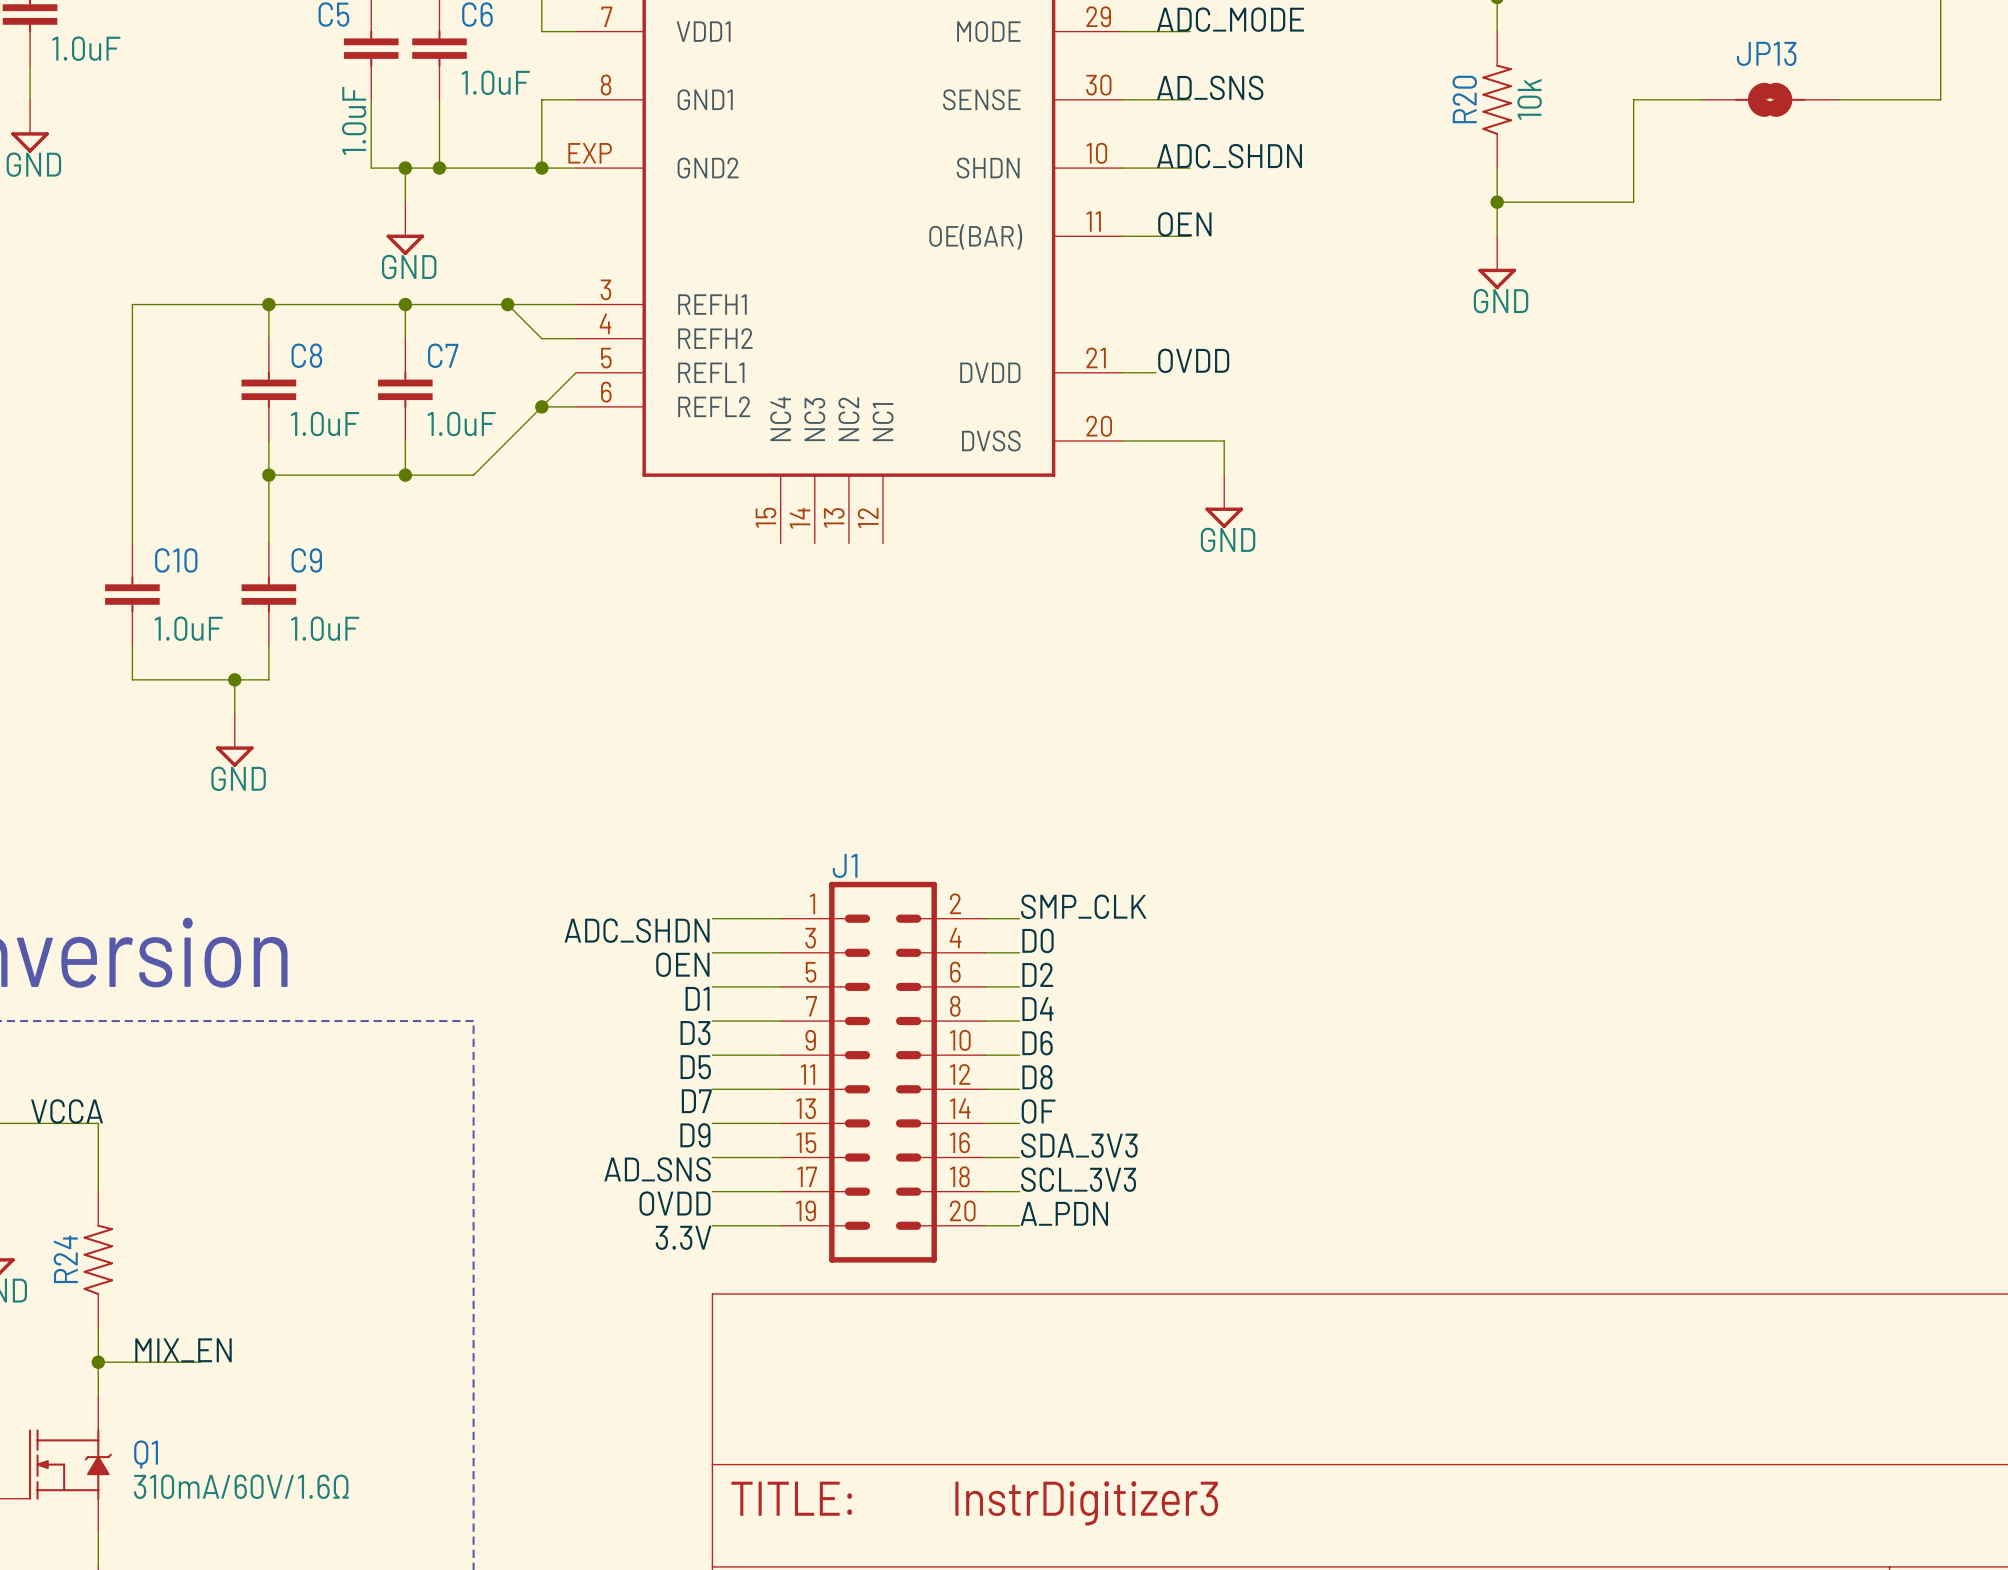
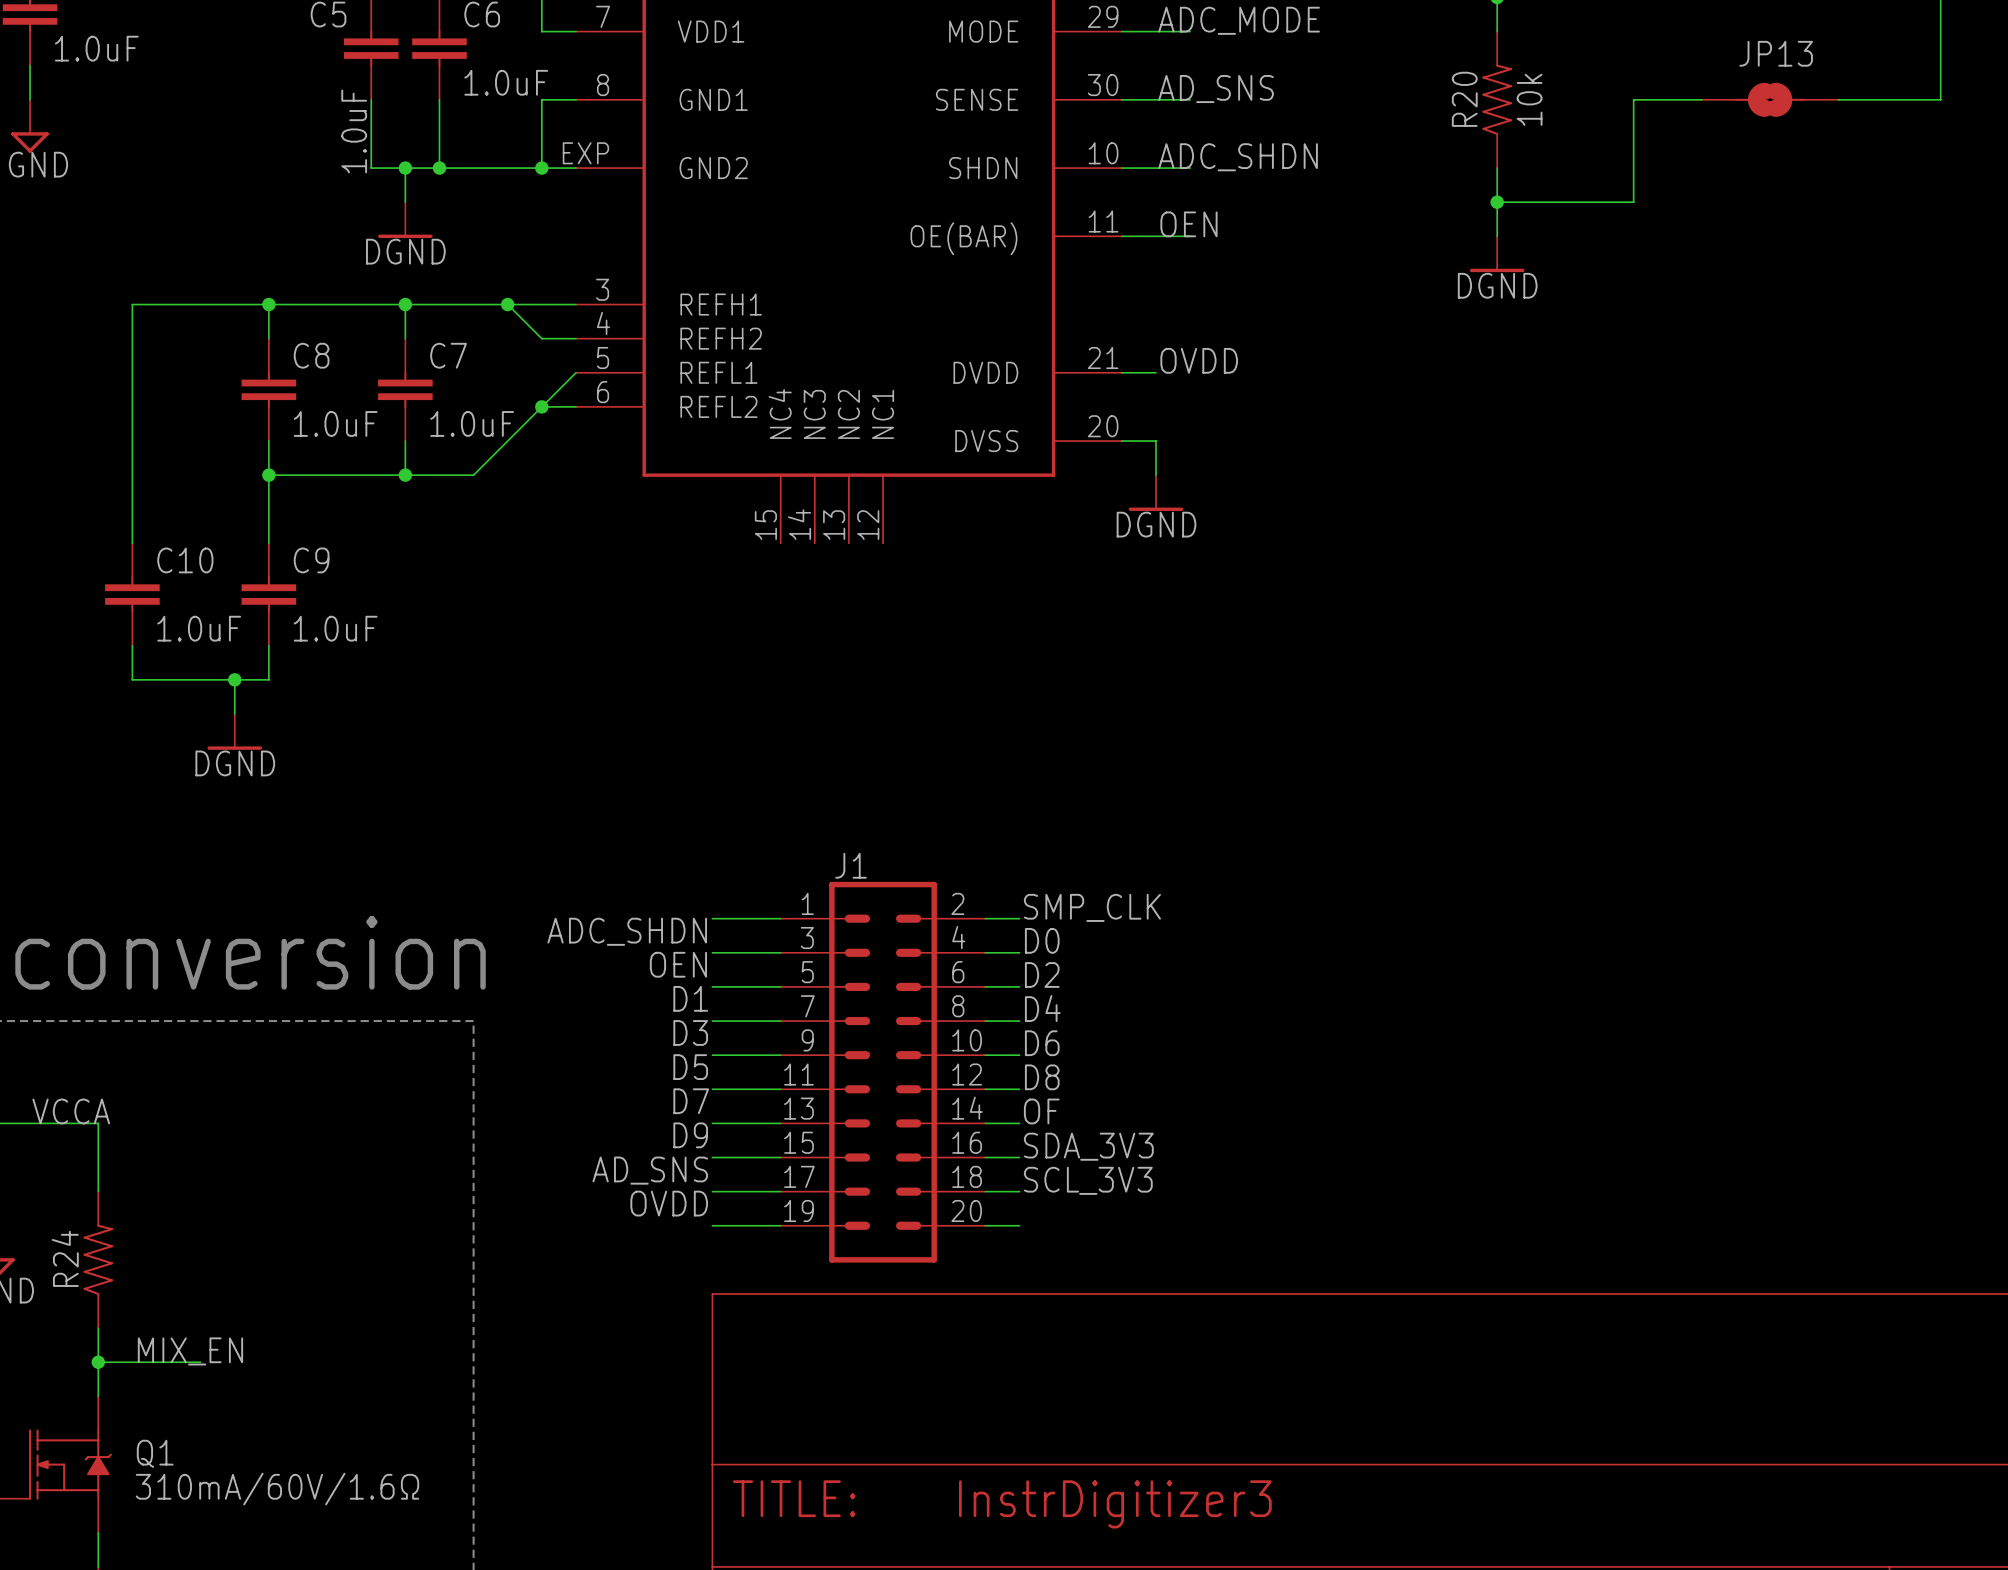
power symbol: GND (405, 228) -> DGND (405, 220)
power symbol: GND (1497, 262) -> DGND (1497, 254)
wire: (1155, 441) (1224, 441) (1224, 475) -> (1155, 441) (1155, 475)
power symbol: none -> DGND (1155, 493)
power symbol: GND (1224, 501) -> none
power symbol: GND (234, 740) -> DGND (234, 731)
label: A_PDN (1064, 1213) -> none
label: 3.3V (683, 1237) -> none

